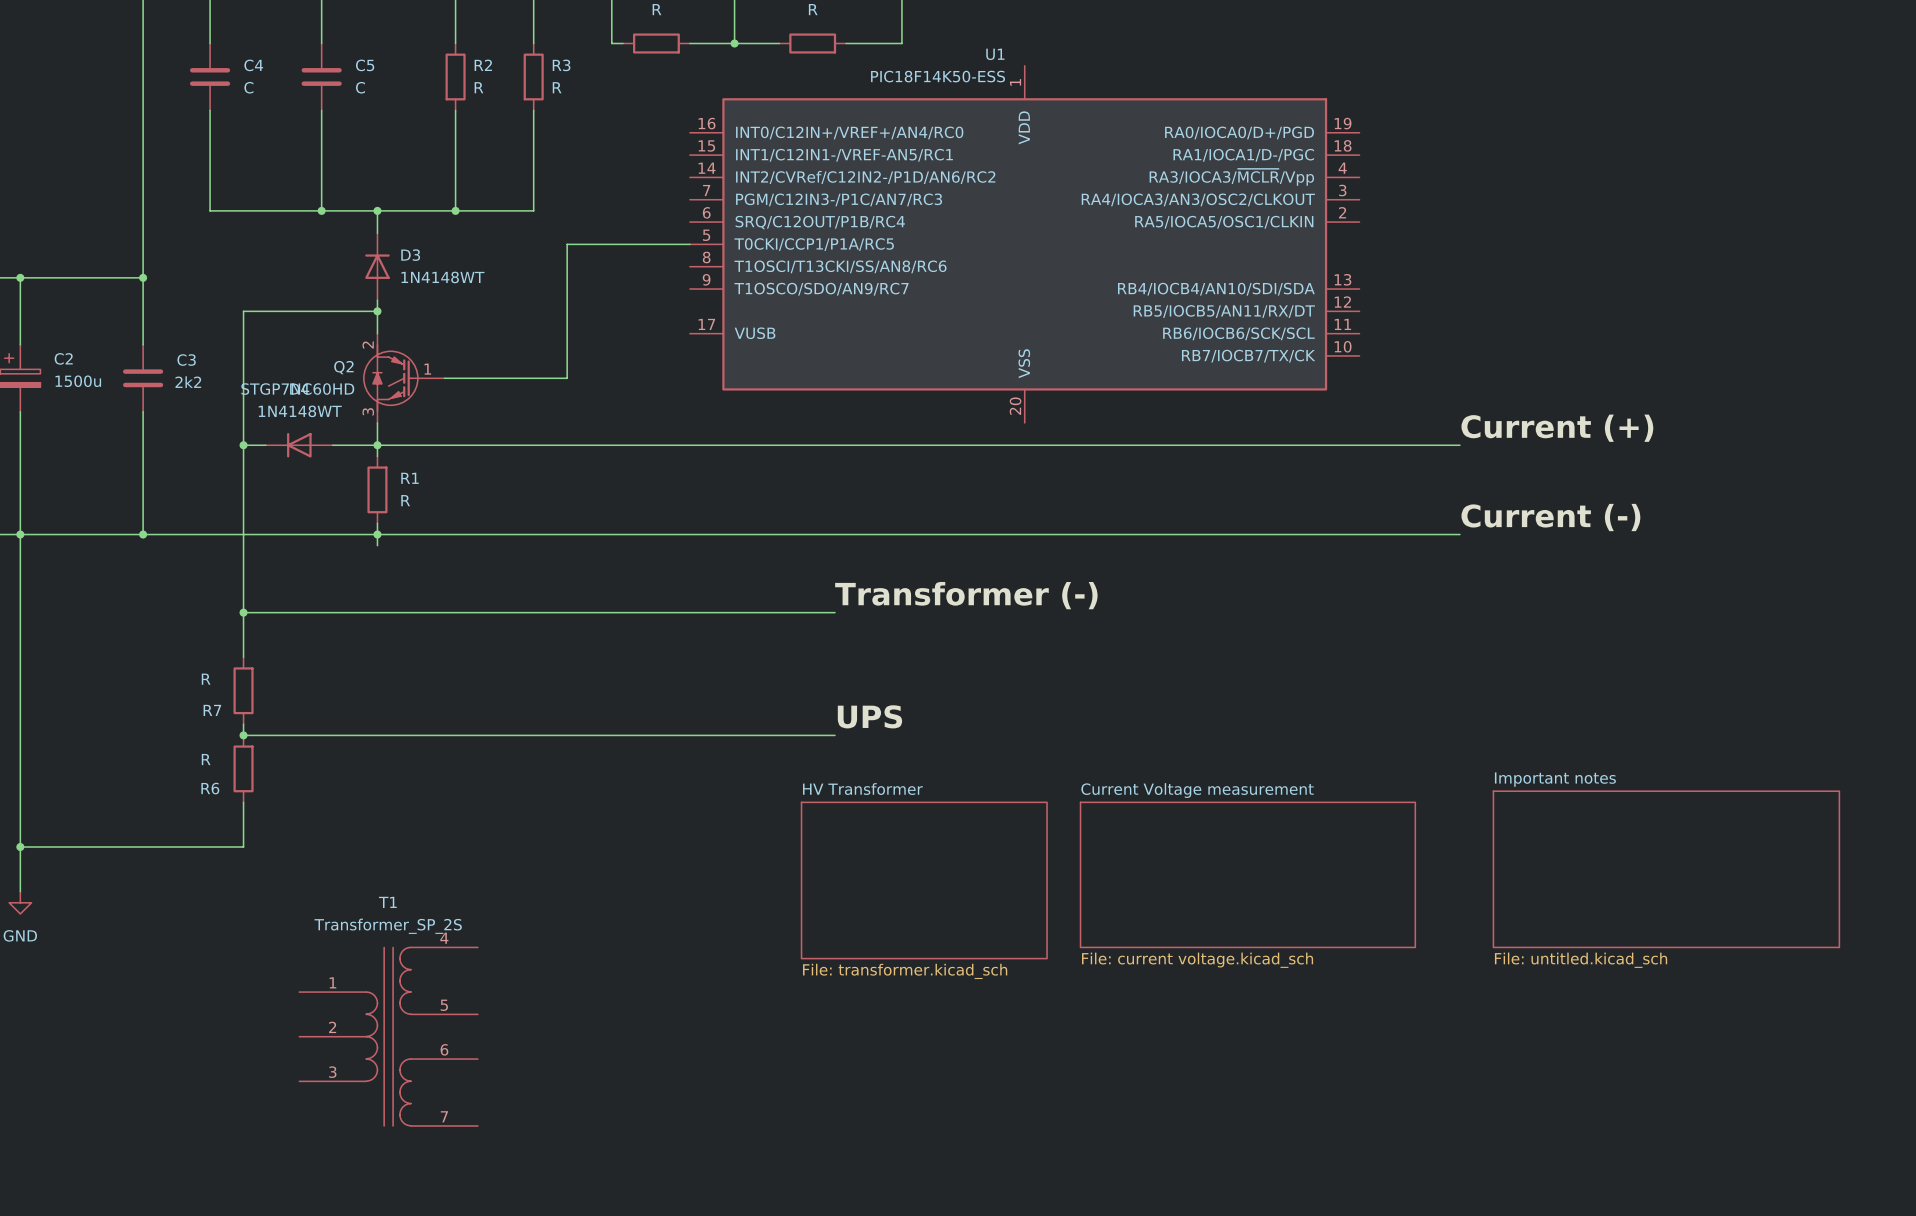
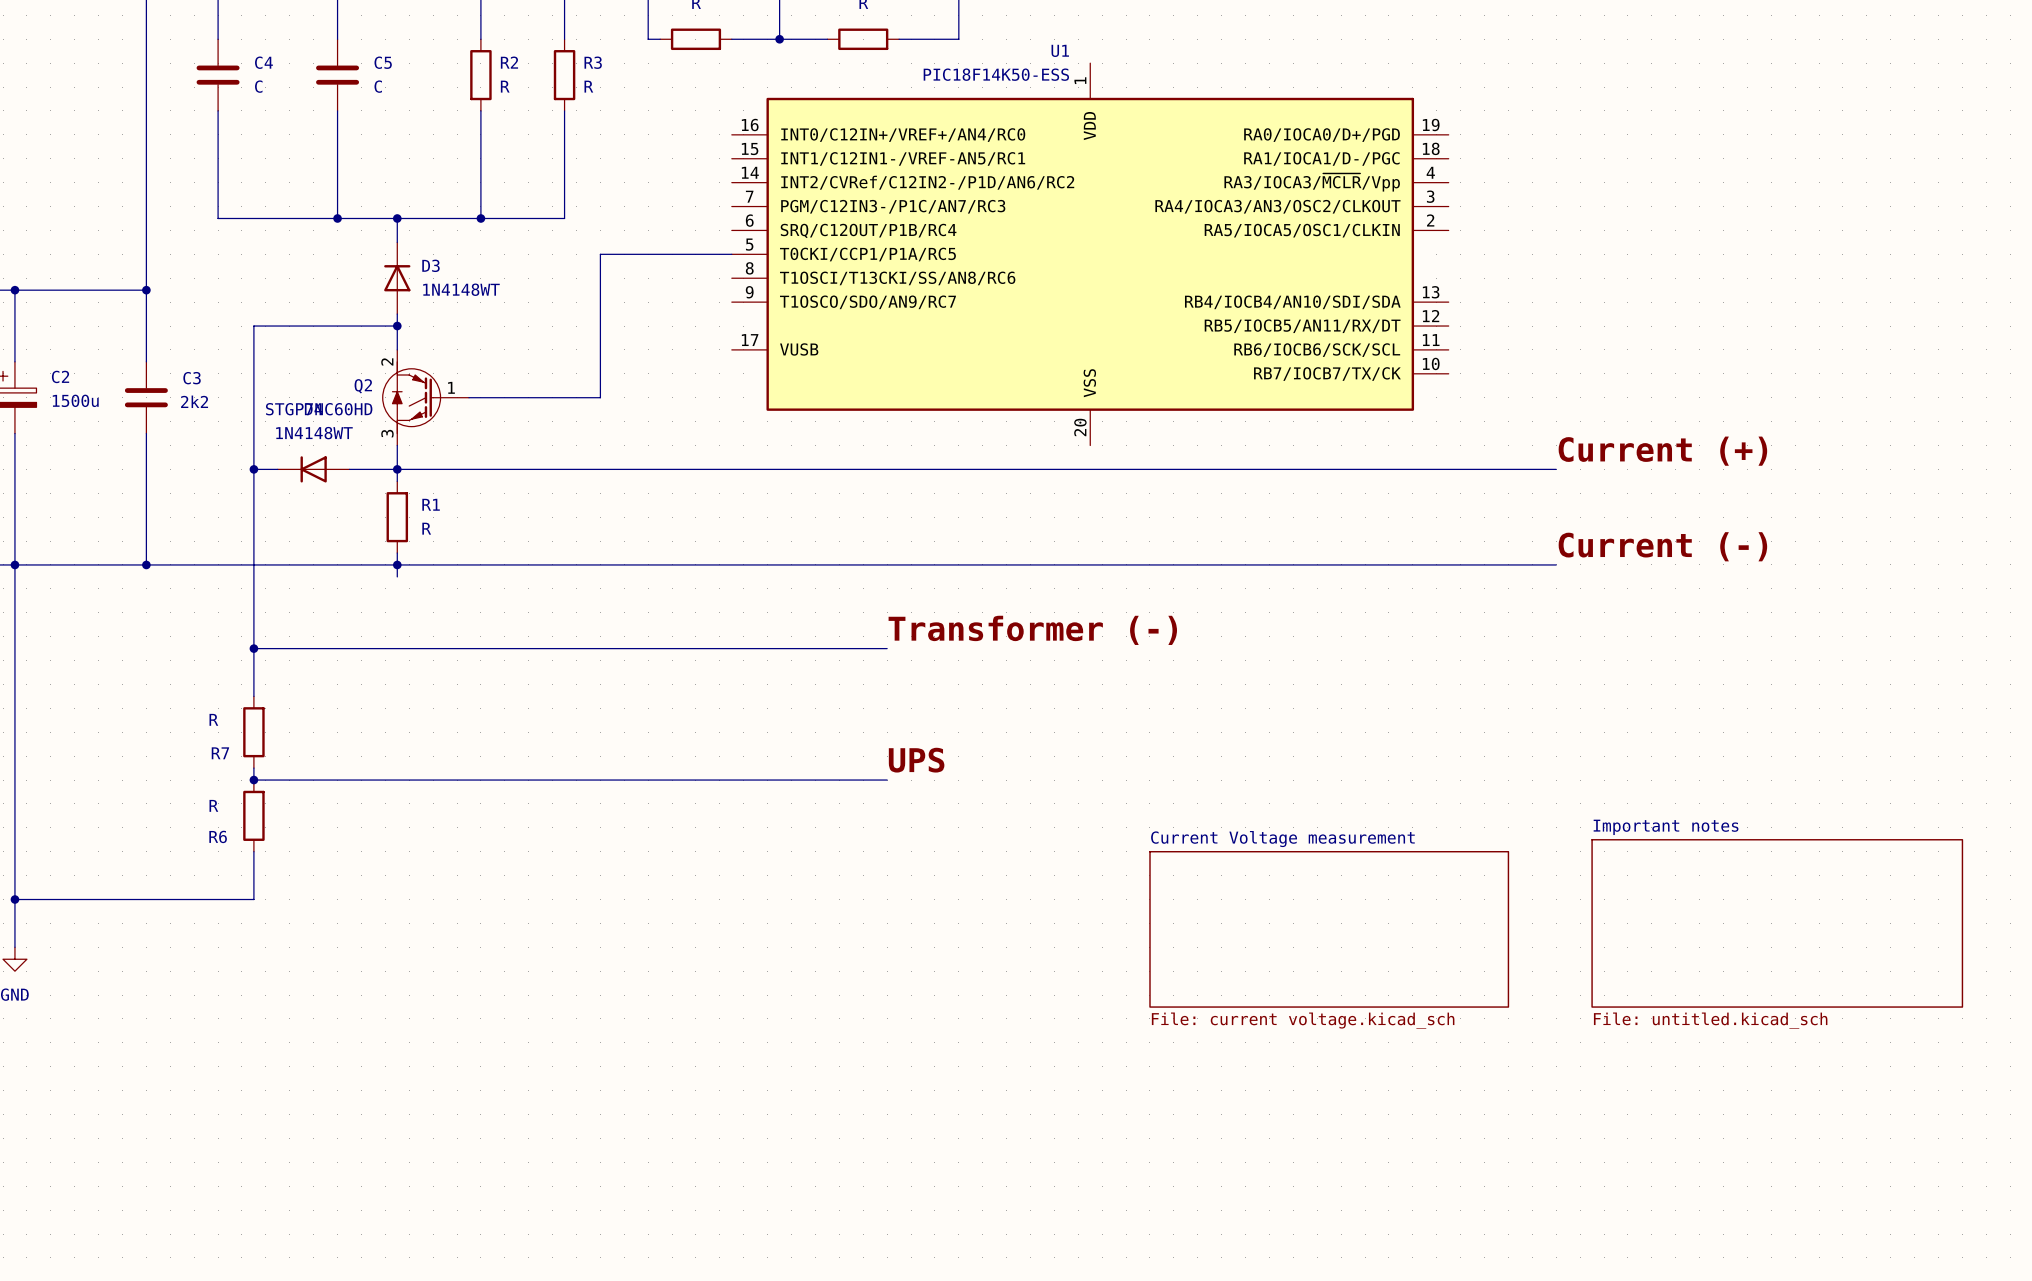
sheet HV Transformer: File: transformer.kicad_sch (924, 880) -> none
T1: Transformer_SP_2S (388, 1036) -> none

